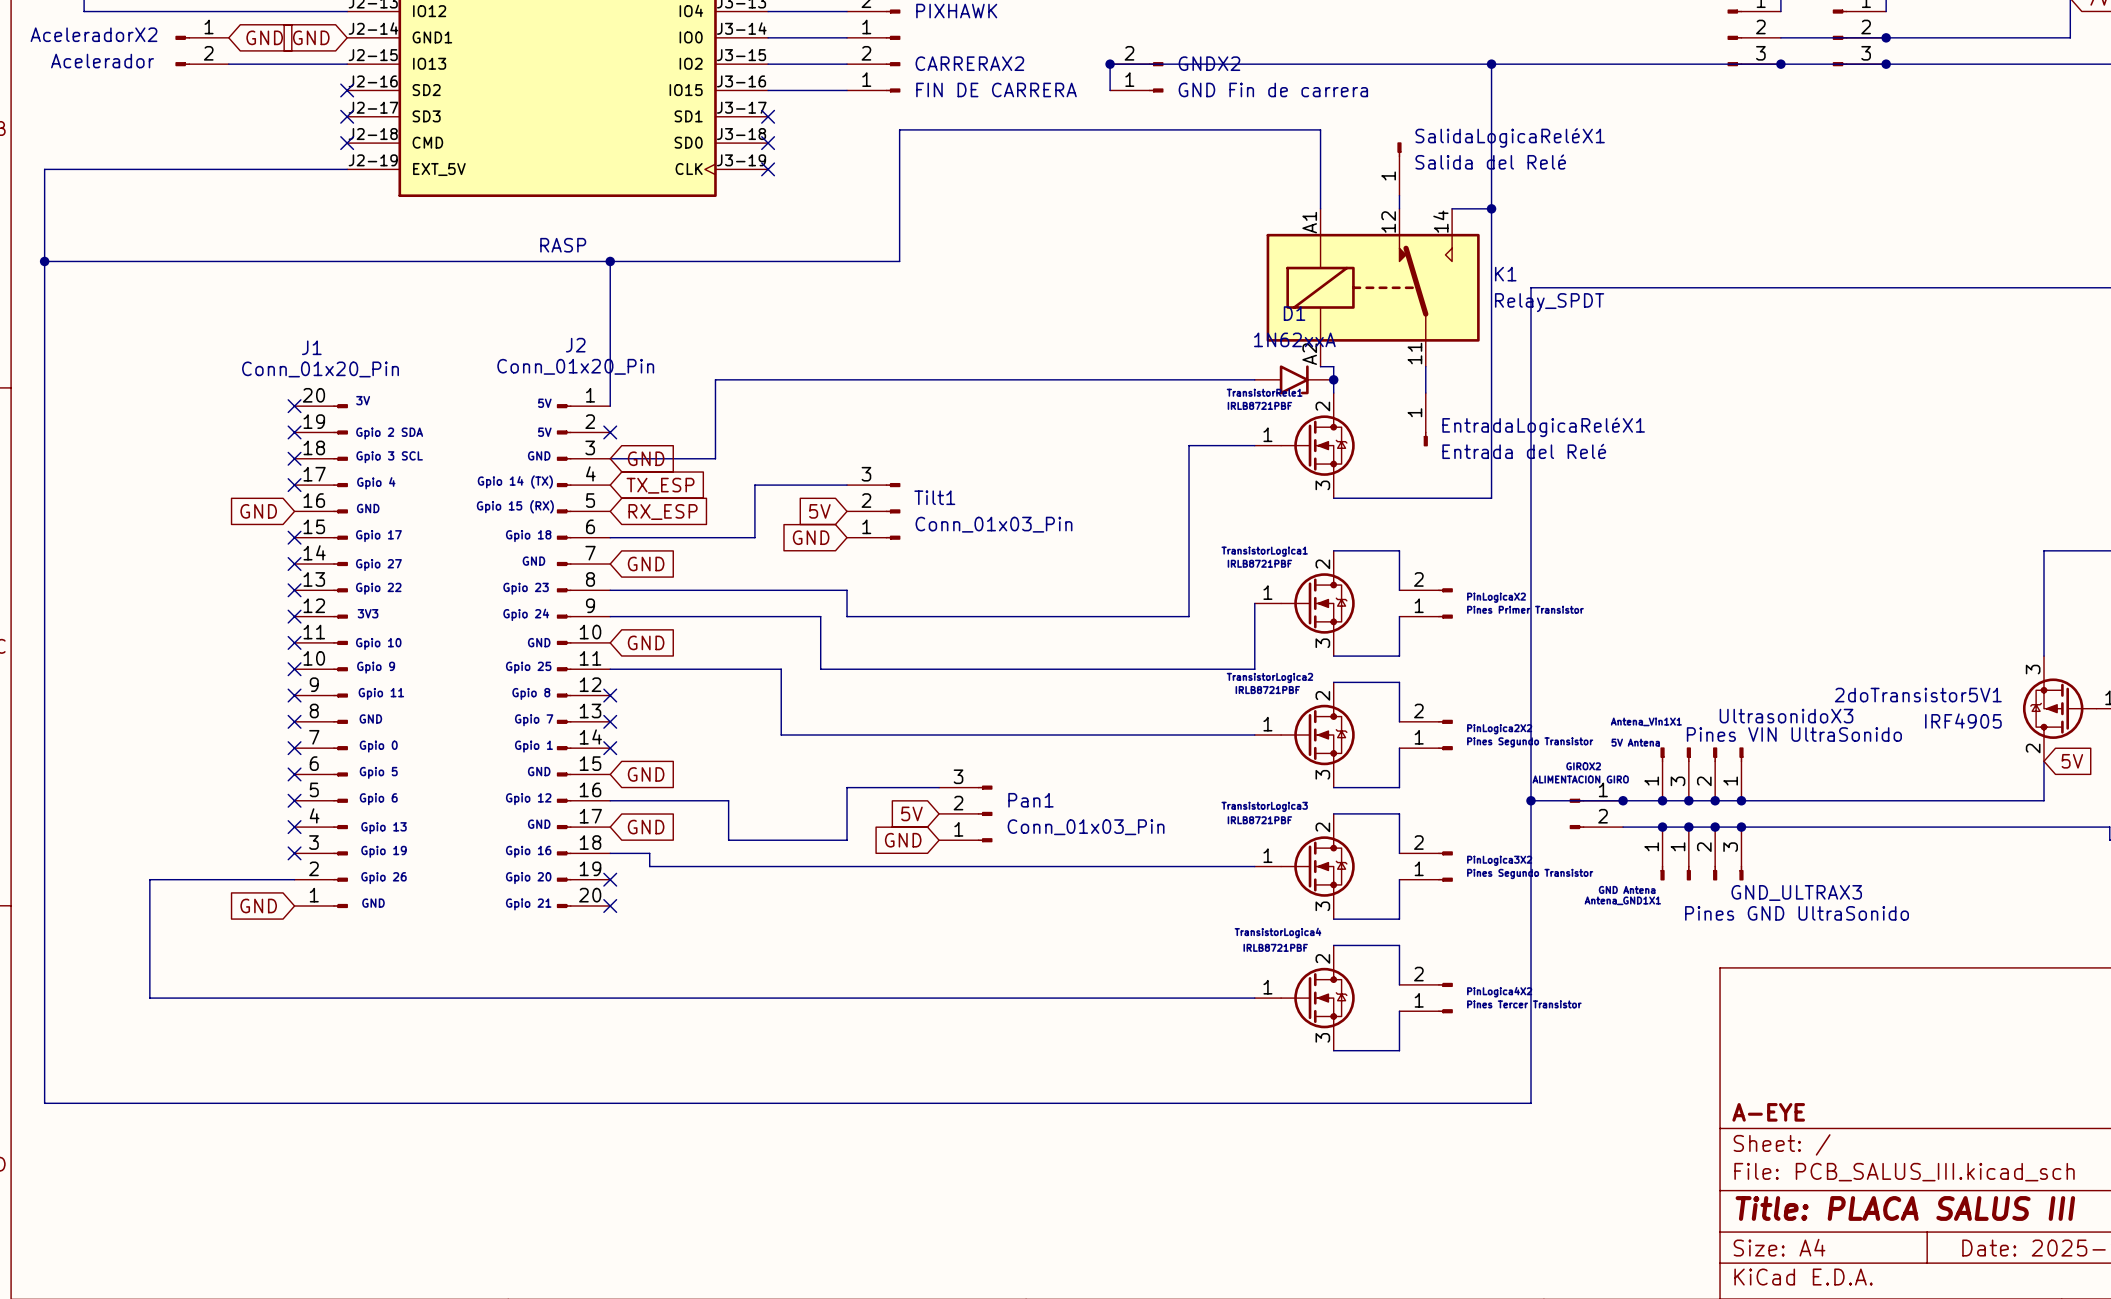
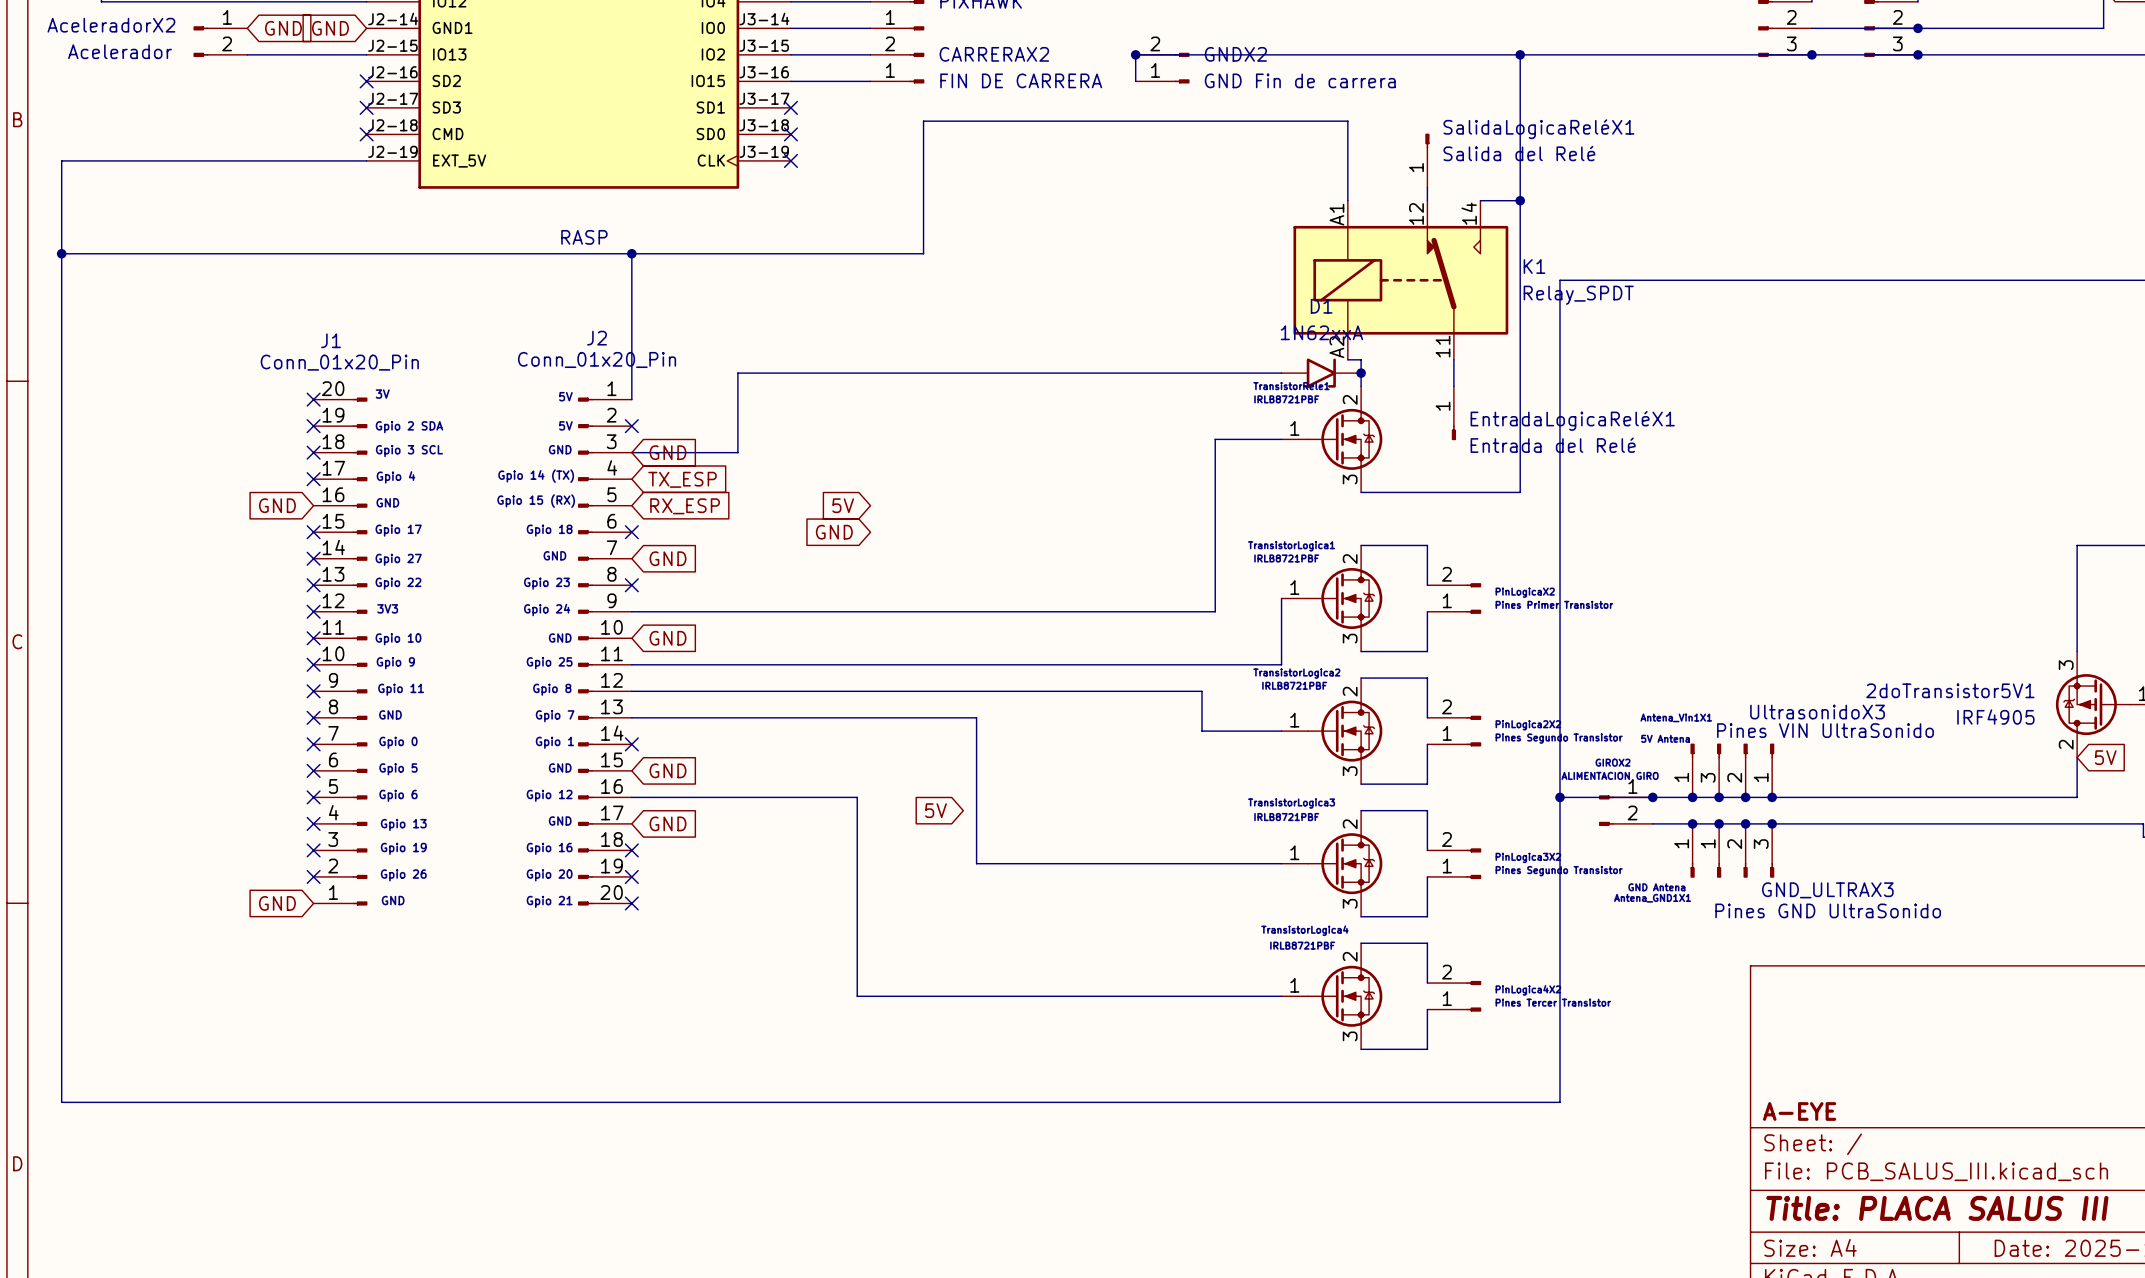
wire: (847, 485) (754, 485) (754, 537) (610, 537) -> none
Tilt1: Conn_01x03_Pin (873, 511) -> none
no-connect mark: none -> (631, 532)
wire: (610, 590) (847, 590) (847, 616) -> none
no-connect mark: none -> (631, 585)
wire: (820, 616) (820, 669) -> (843, 611) (870, 611)
wire: (781, 669) (781, 735) (1175, 735) -> (631, 691) (1201, 691) (1201, 731)
wire: none -> (804, 664) (843, 664)
no-connect mark: (610, 695) -> none
no-connect mark: (610, 721) -> none
wire: (939, 787) (847, 787) (847, 840) (728, 840) (728, 800) -> (857, 996) (857, 797) (751, 797)
Pan1: Conn_01x03_Pin (965, 813) -> none
global label: GND (903, 840) -> none
wire: (610, 853) (649, 853) (649, 866) (952, 866) -> (631, 717) (976, 717) (976, 863)
no-connect mark: none -> (631, 850)
wire: (294, 879) (149, 879) (149, 998) (833, 998) -> none
no-connect mark: none -> (313, 876)

